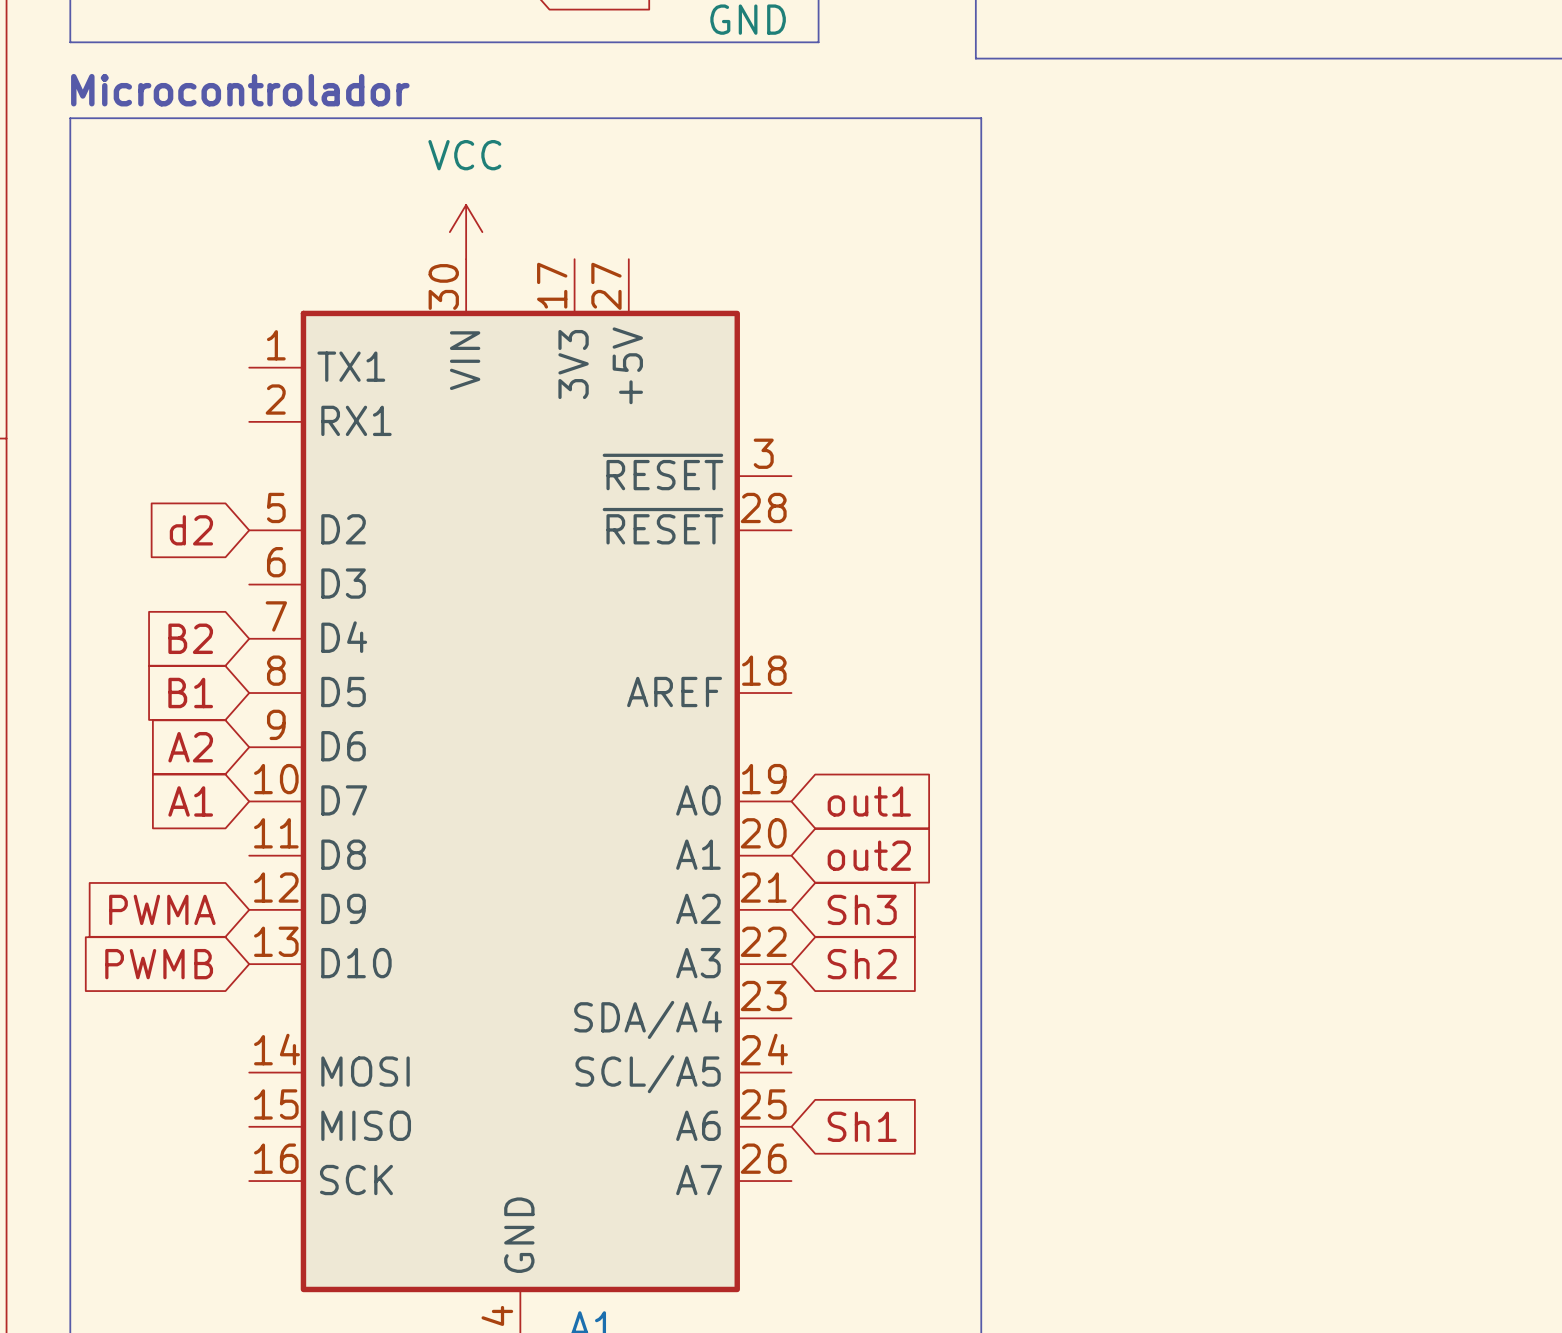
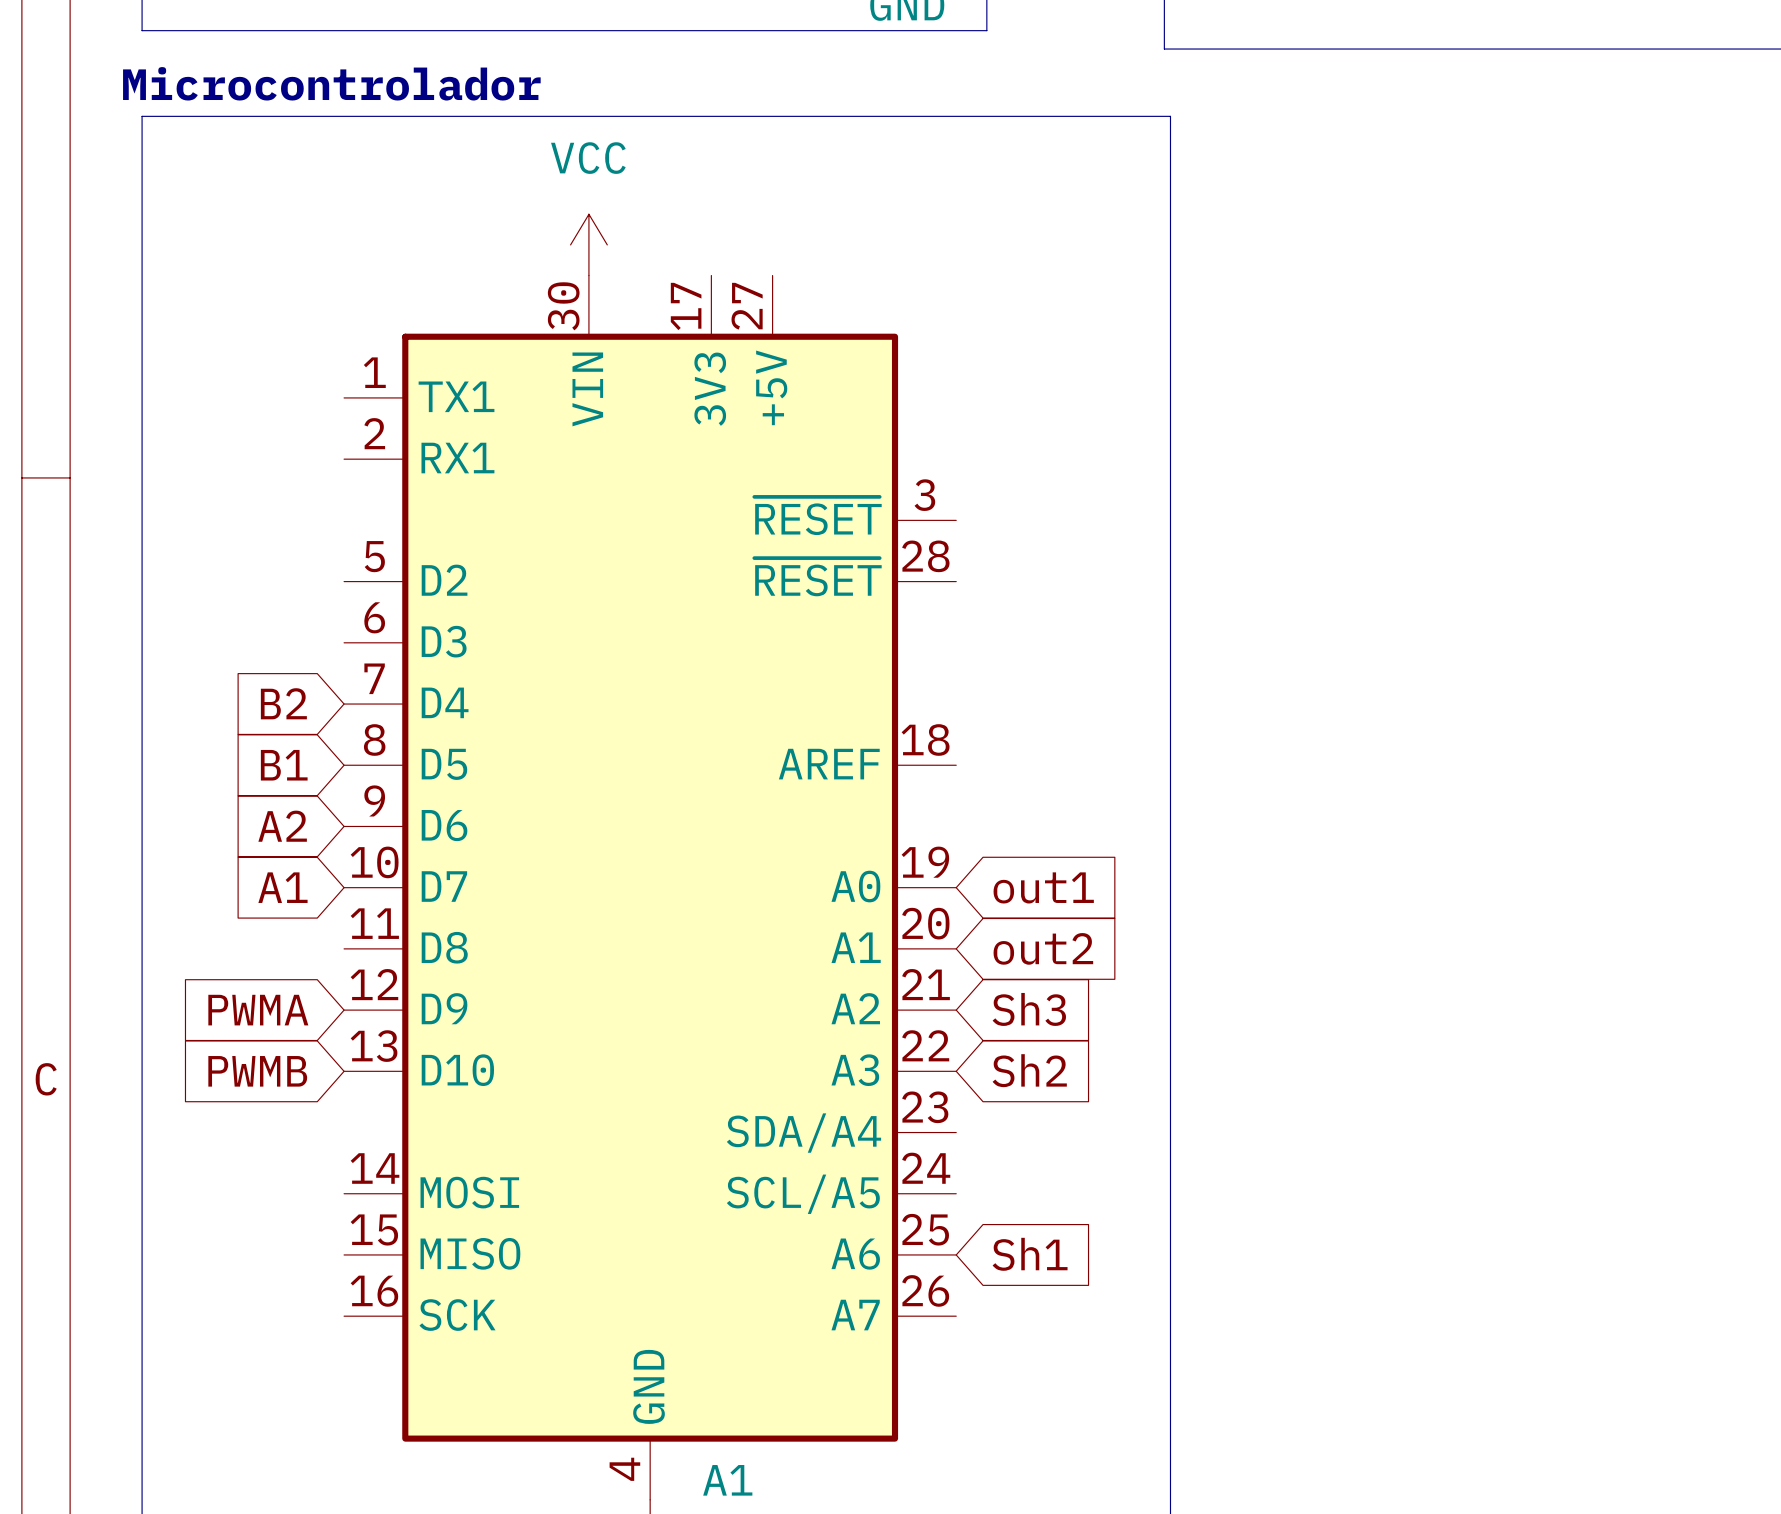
global label: d2 (191, 530) -> none

